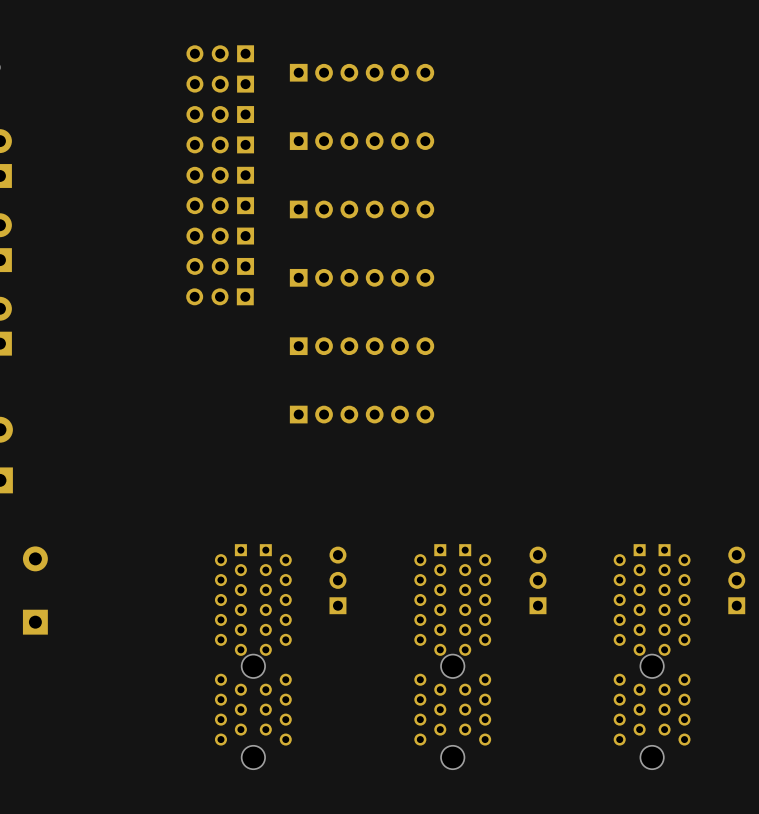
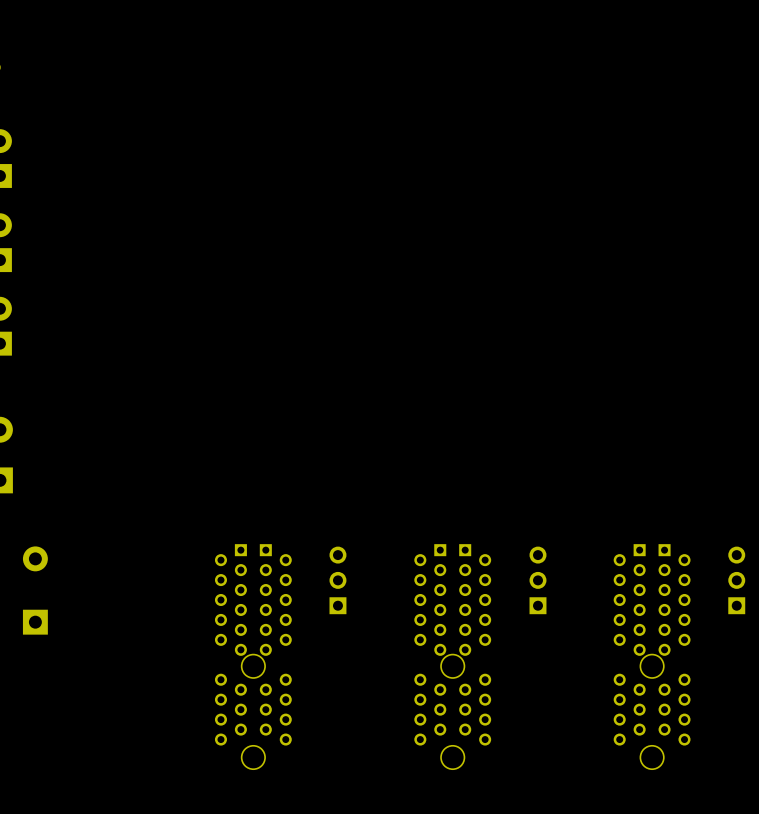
part: (220, 53) -> none
part: (362, 72) -> none
part: (220, 84) -> none
part: (220, 114) -> none
part: (362, 141) -> none
part: (220, 144) -> none
part: (220, 175) -> none
part: (220, 205) -> none
part: (362, 209) -> none
part: (220, 236) -> none
part: (220, 266) -> none
part: (362, 277) -> none
part: (219, 296) -> none
part: (362, 346) -> none
part: (362, 414) -> none

